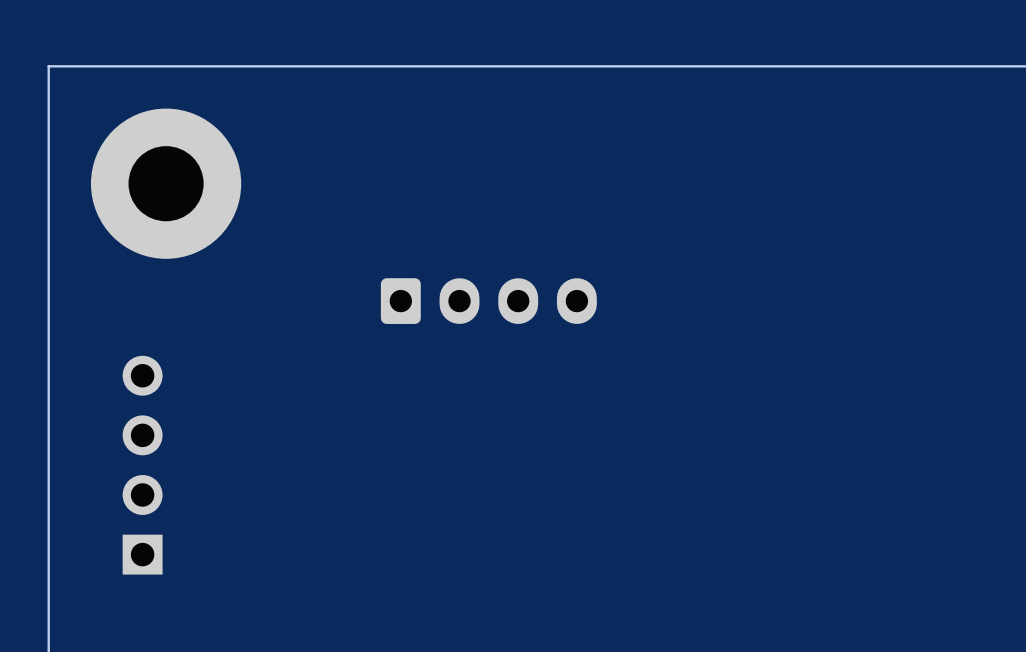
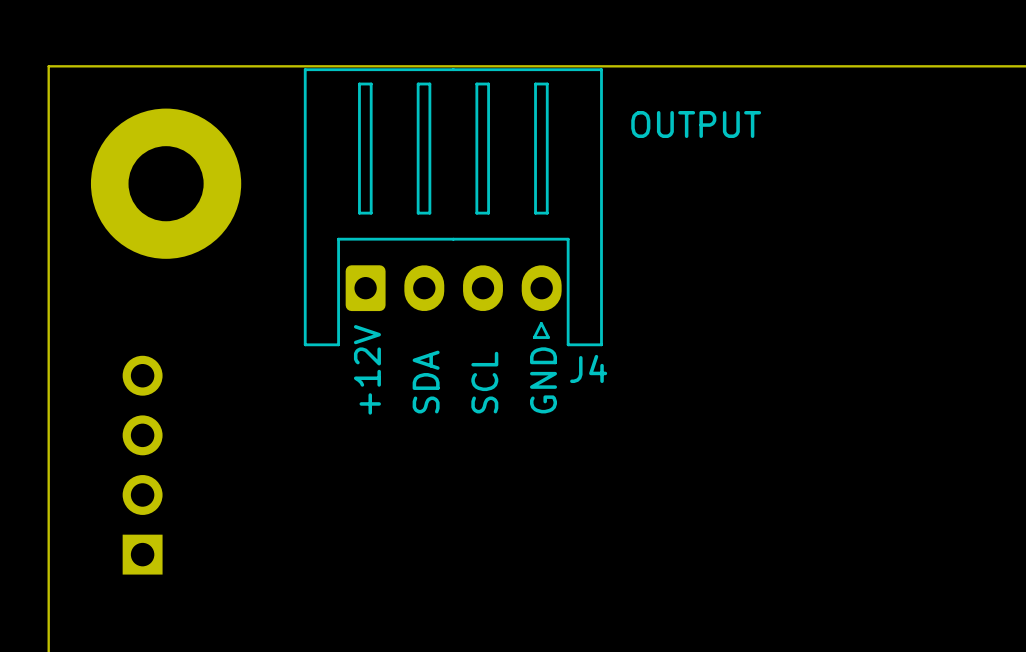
text: none -> OUTPUT (696, 124)
J4: none -> (453, 207)
part position: (488, 301) -> (453, 288)
text: none -> +12V (367, 369)
text: none -> GND (543, 380)
text: none -> SDA (426, 382)
text: none -> SCL (484, 382)

